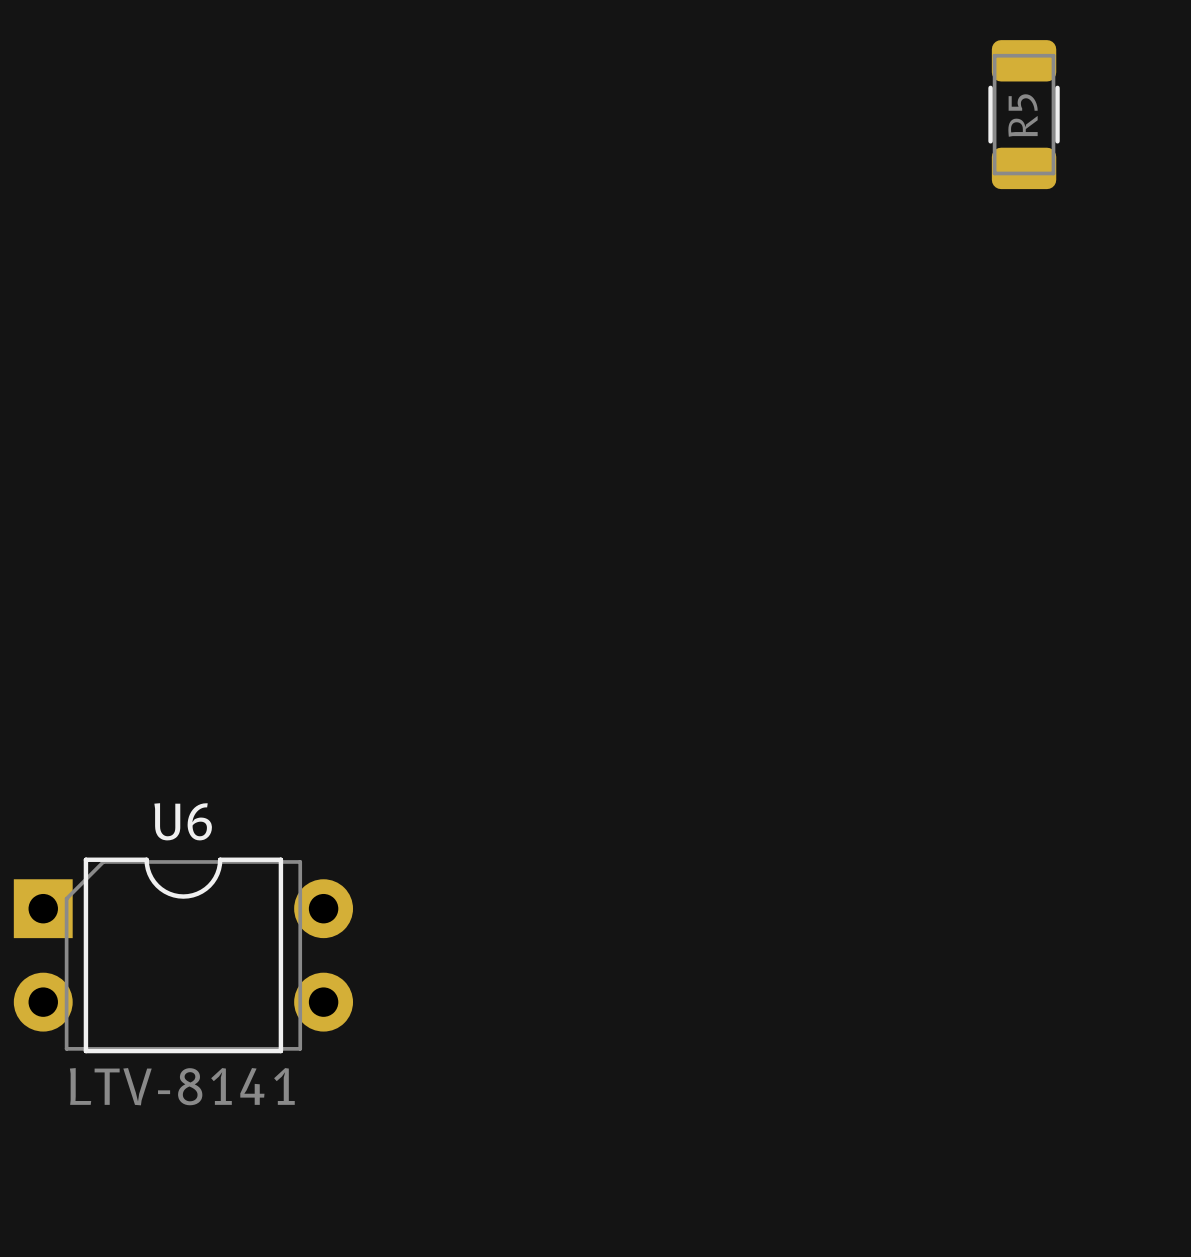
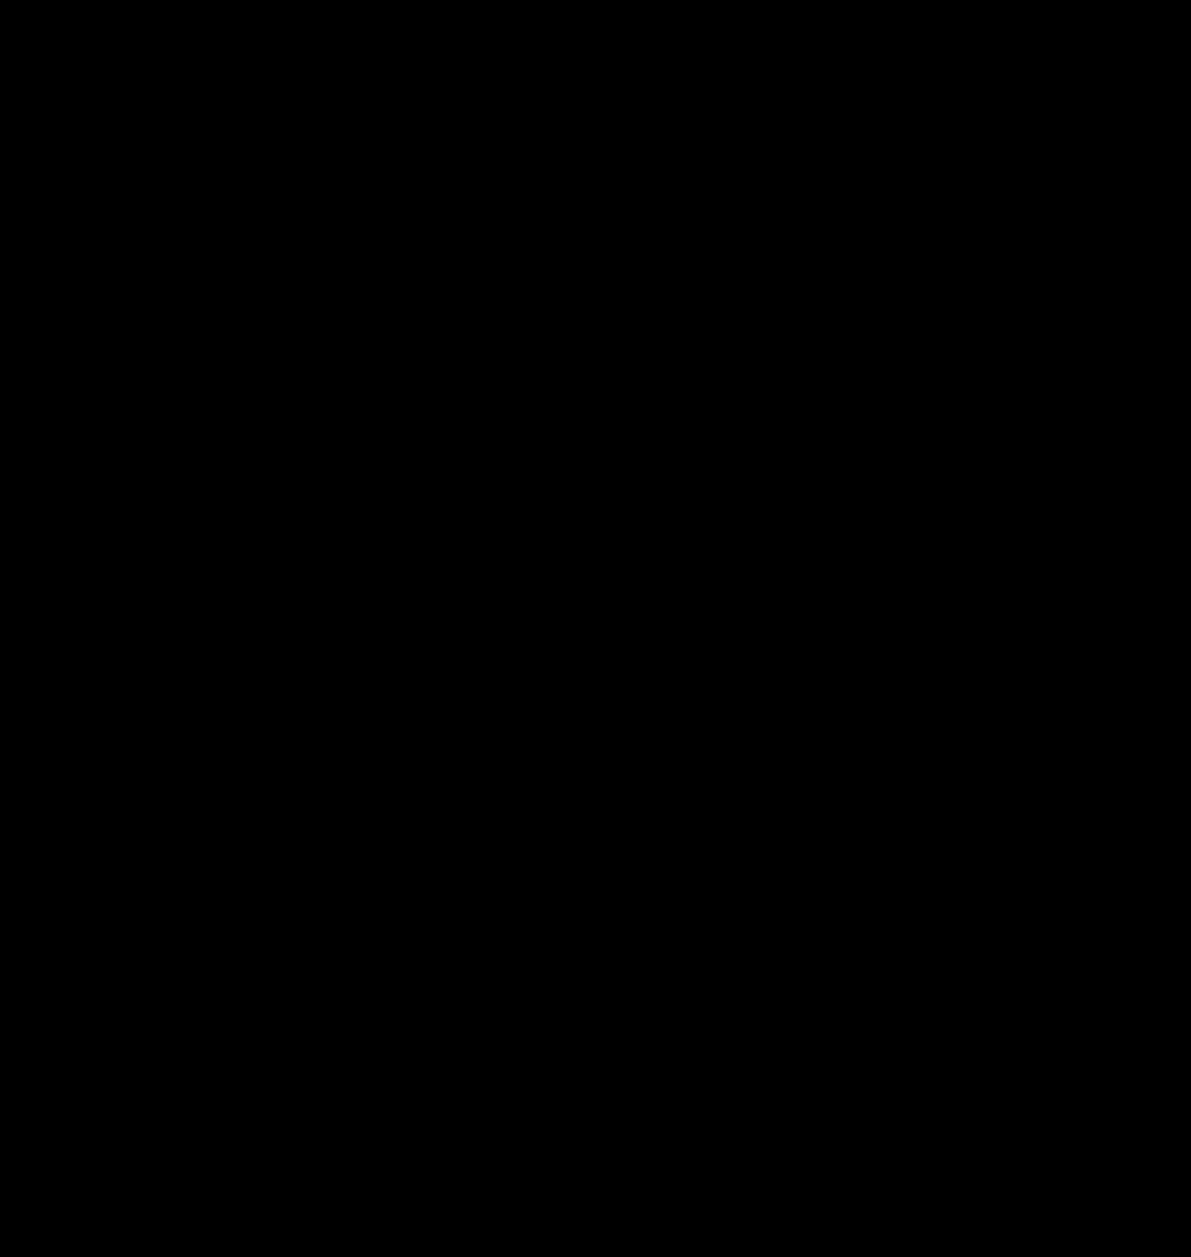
R5: (1024, 114) -> none
U6: LTV-8141 (183, 955) -> none

